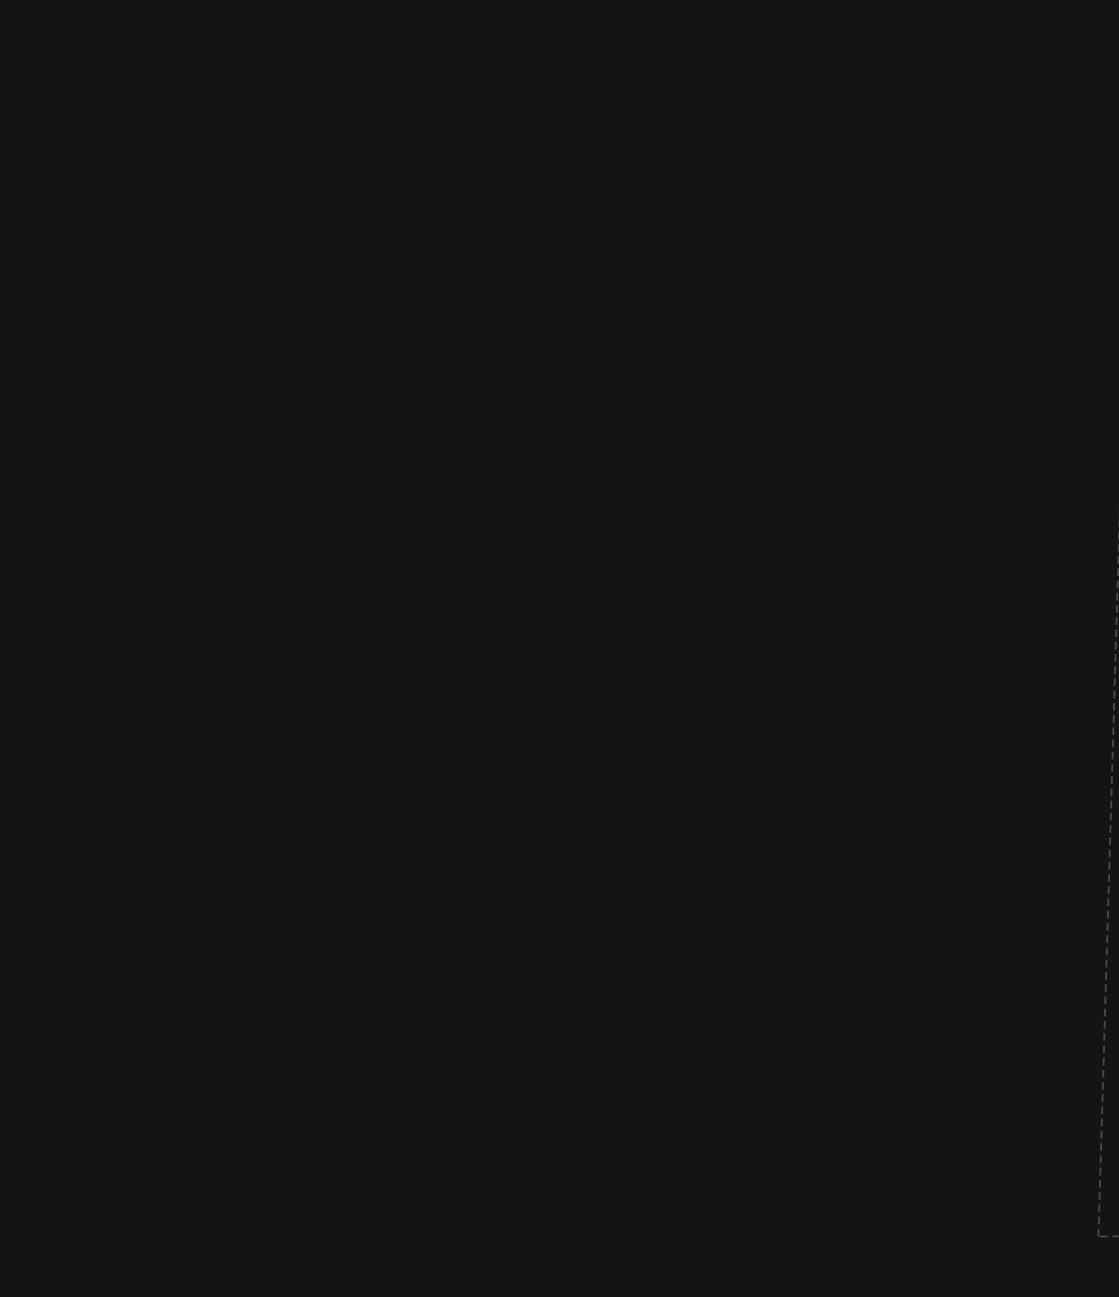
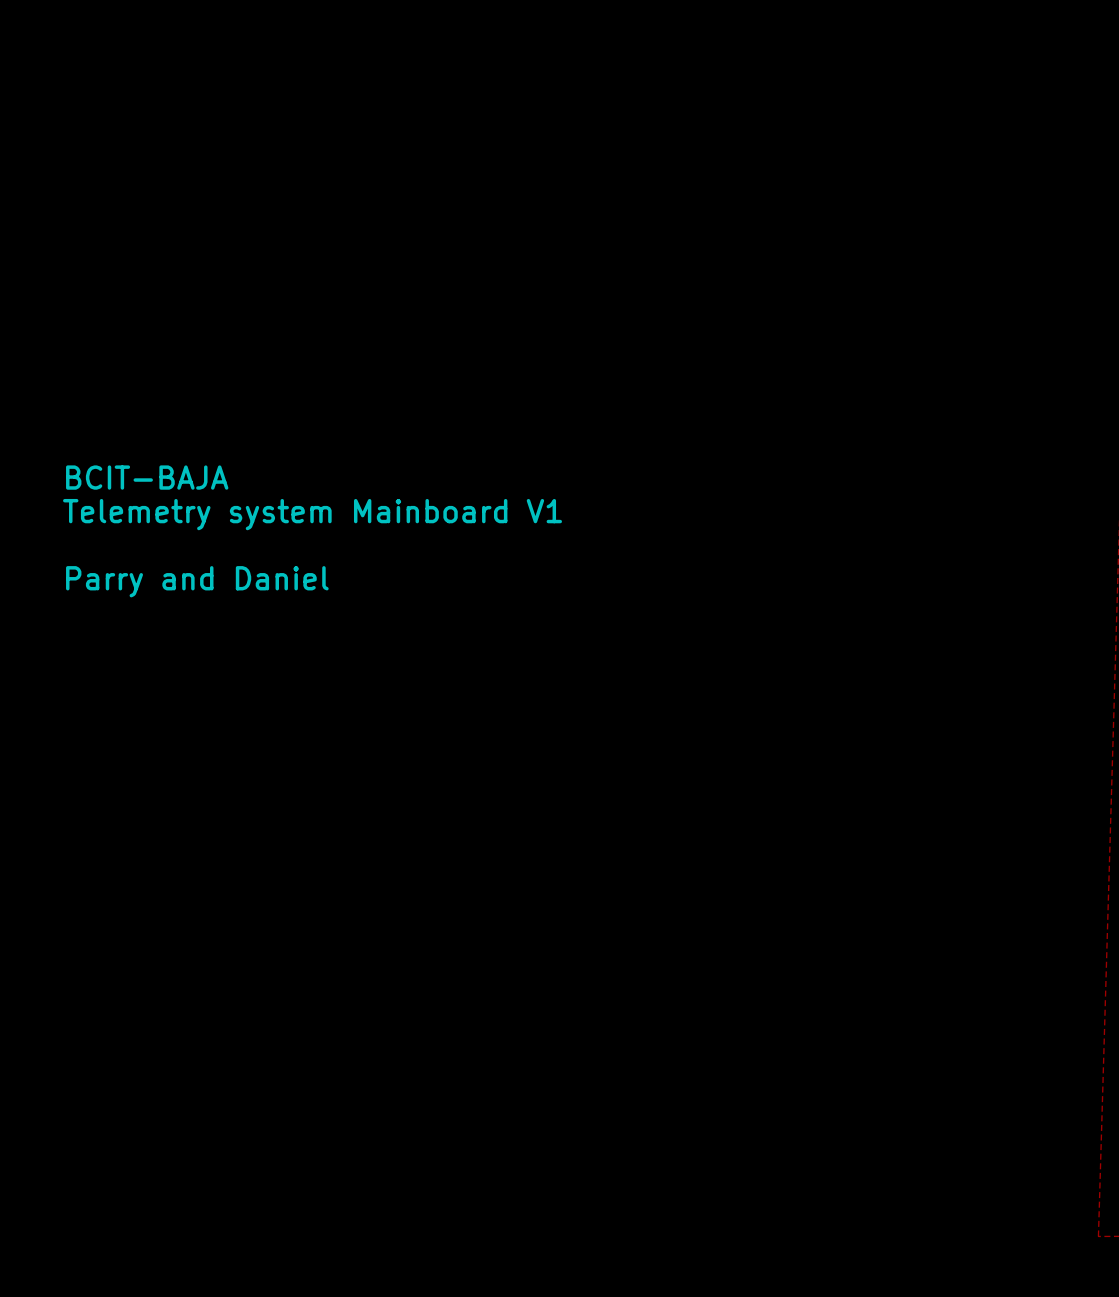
text: none -> BCIT-BAJA (147, 477)
text: none -> Telemetry system Mainboard V1 (312, 514)
text: none -> Parry and Daniel (197, 581)

